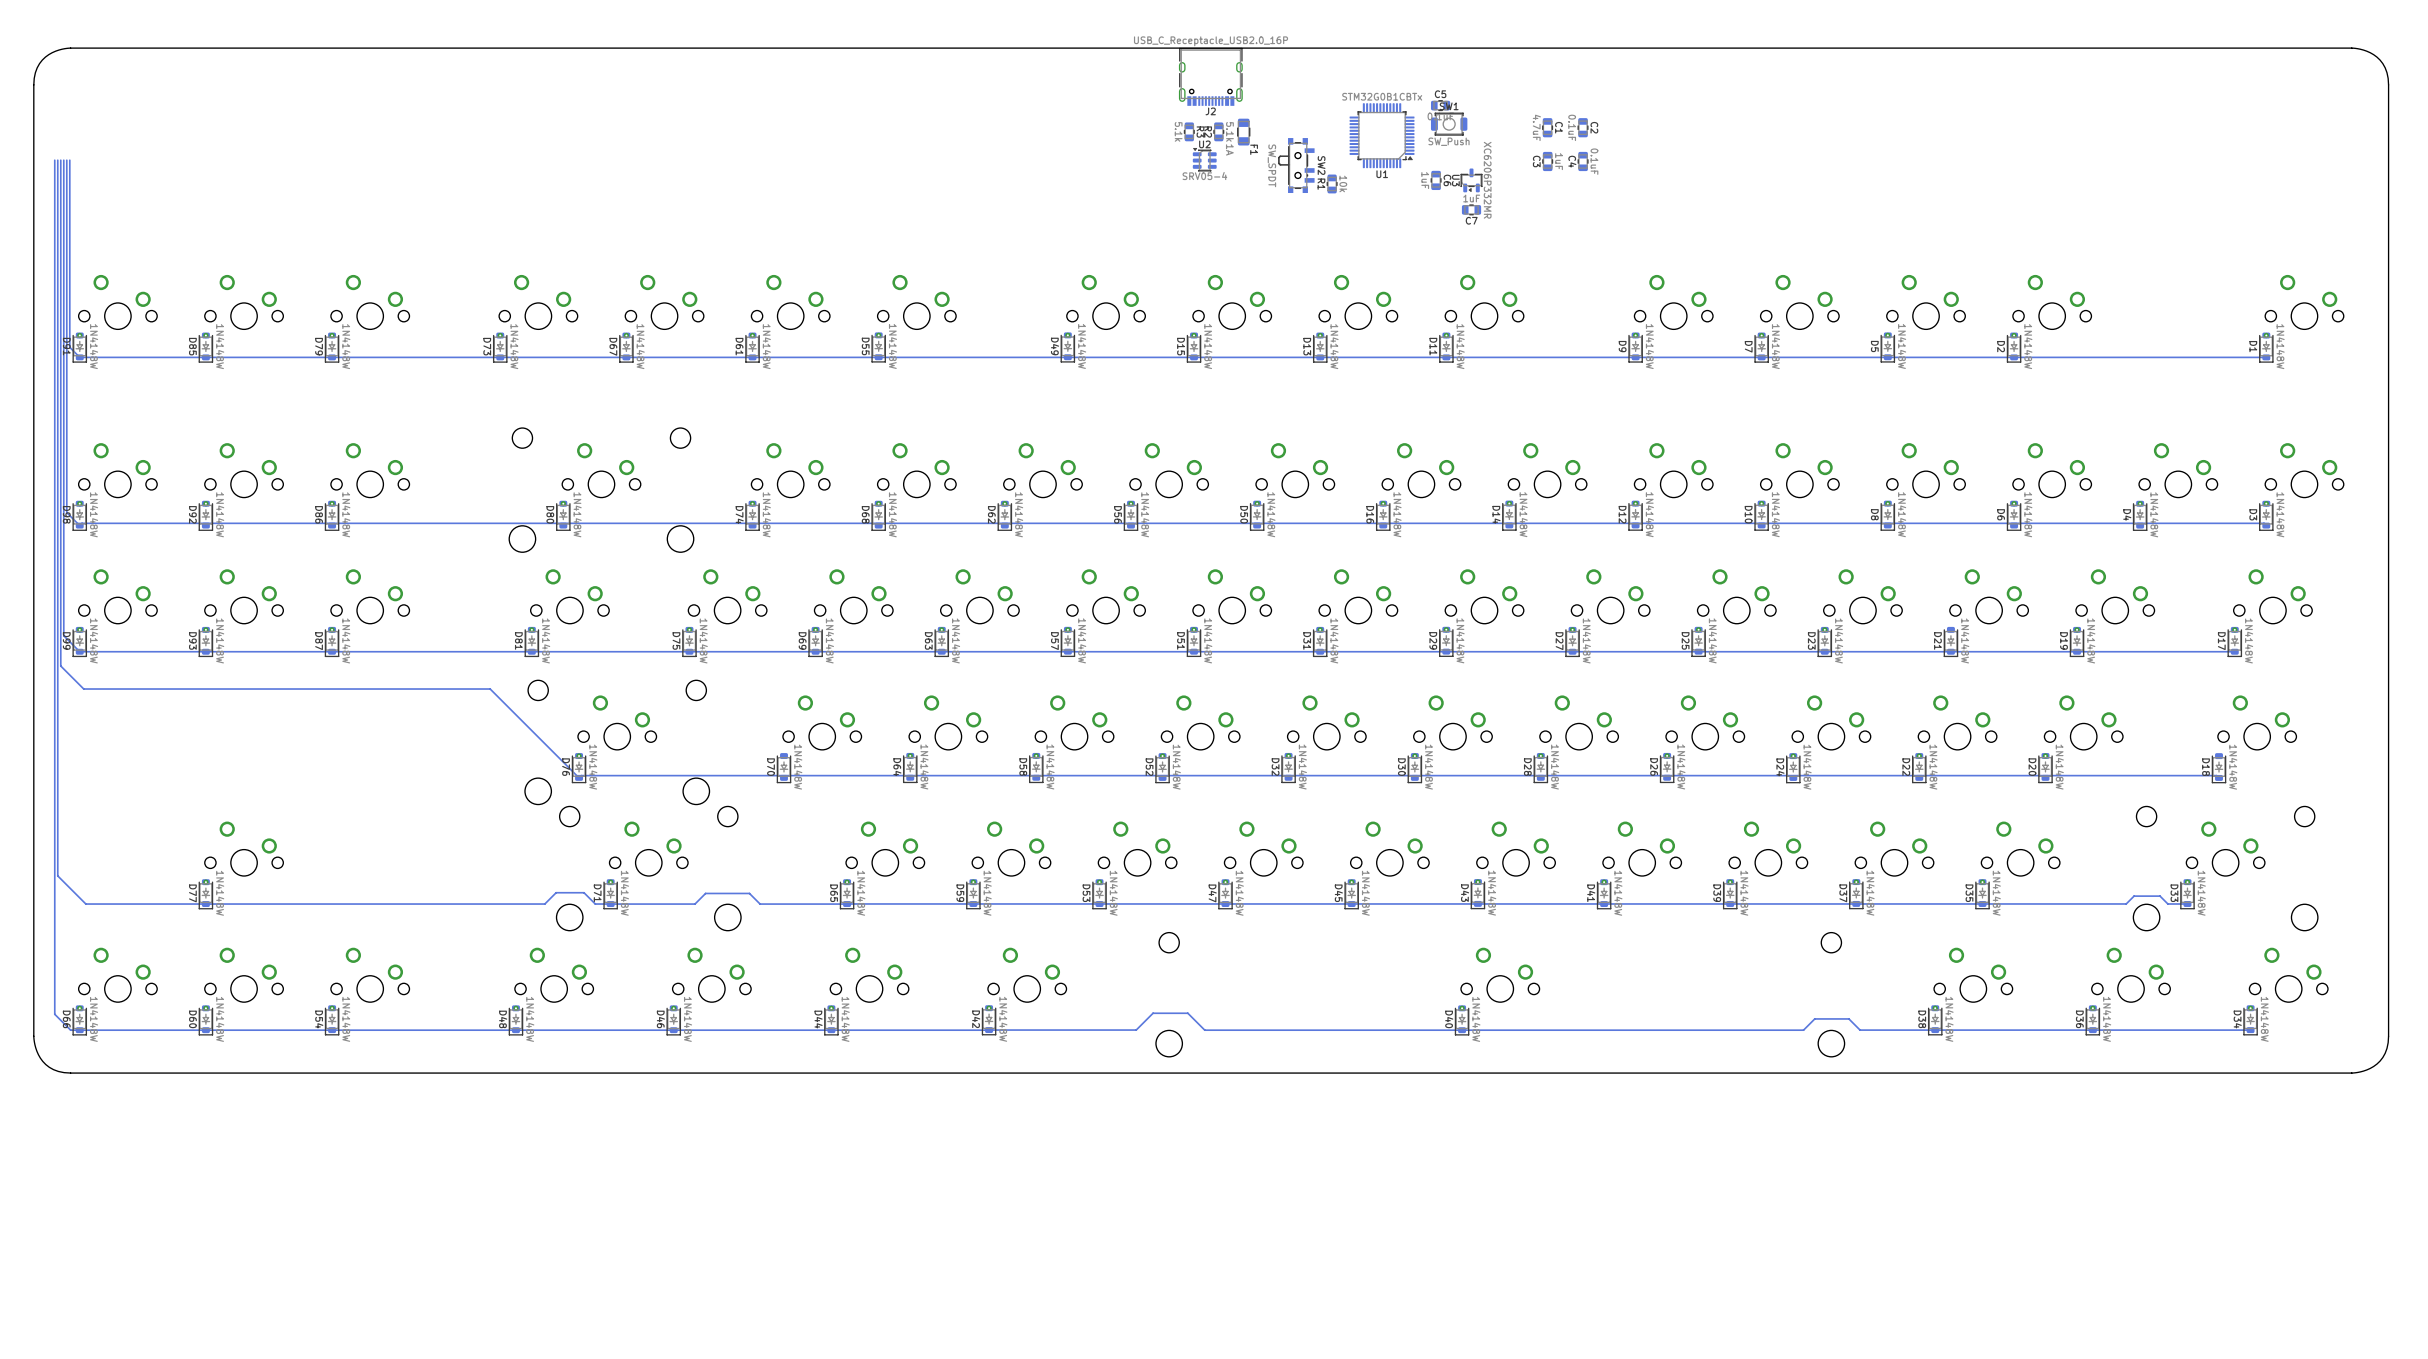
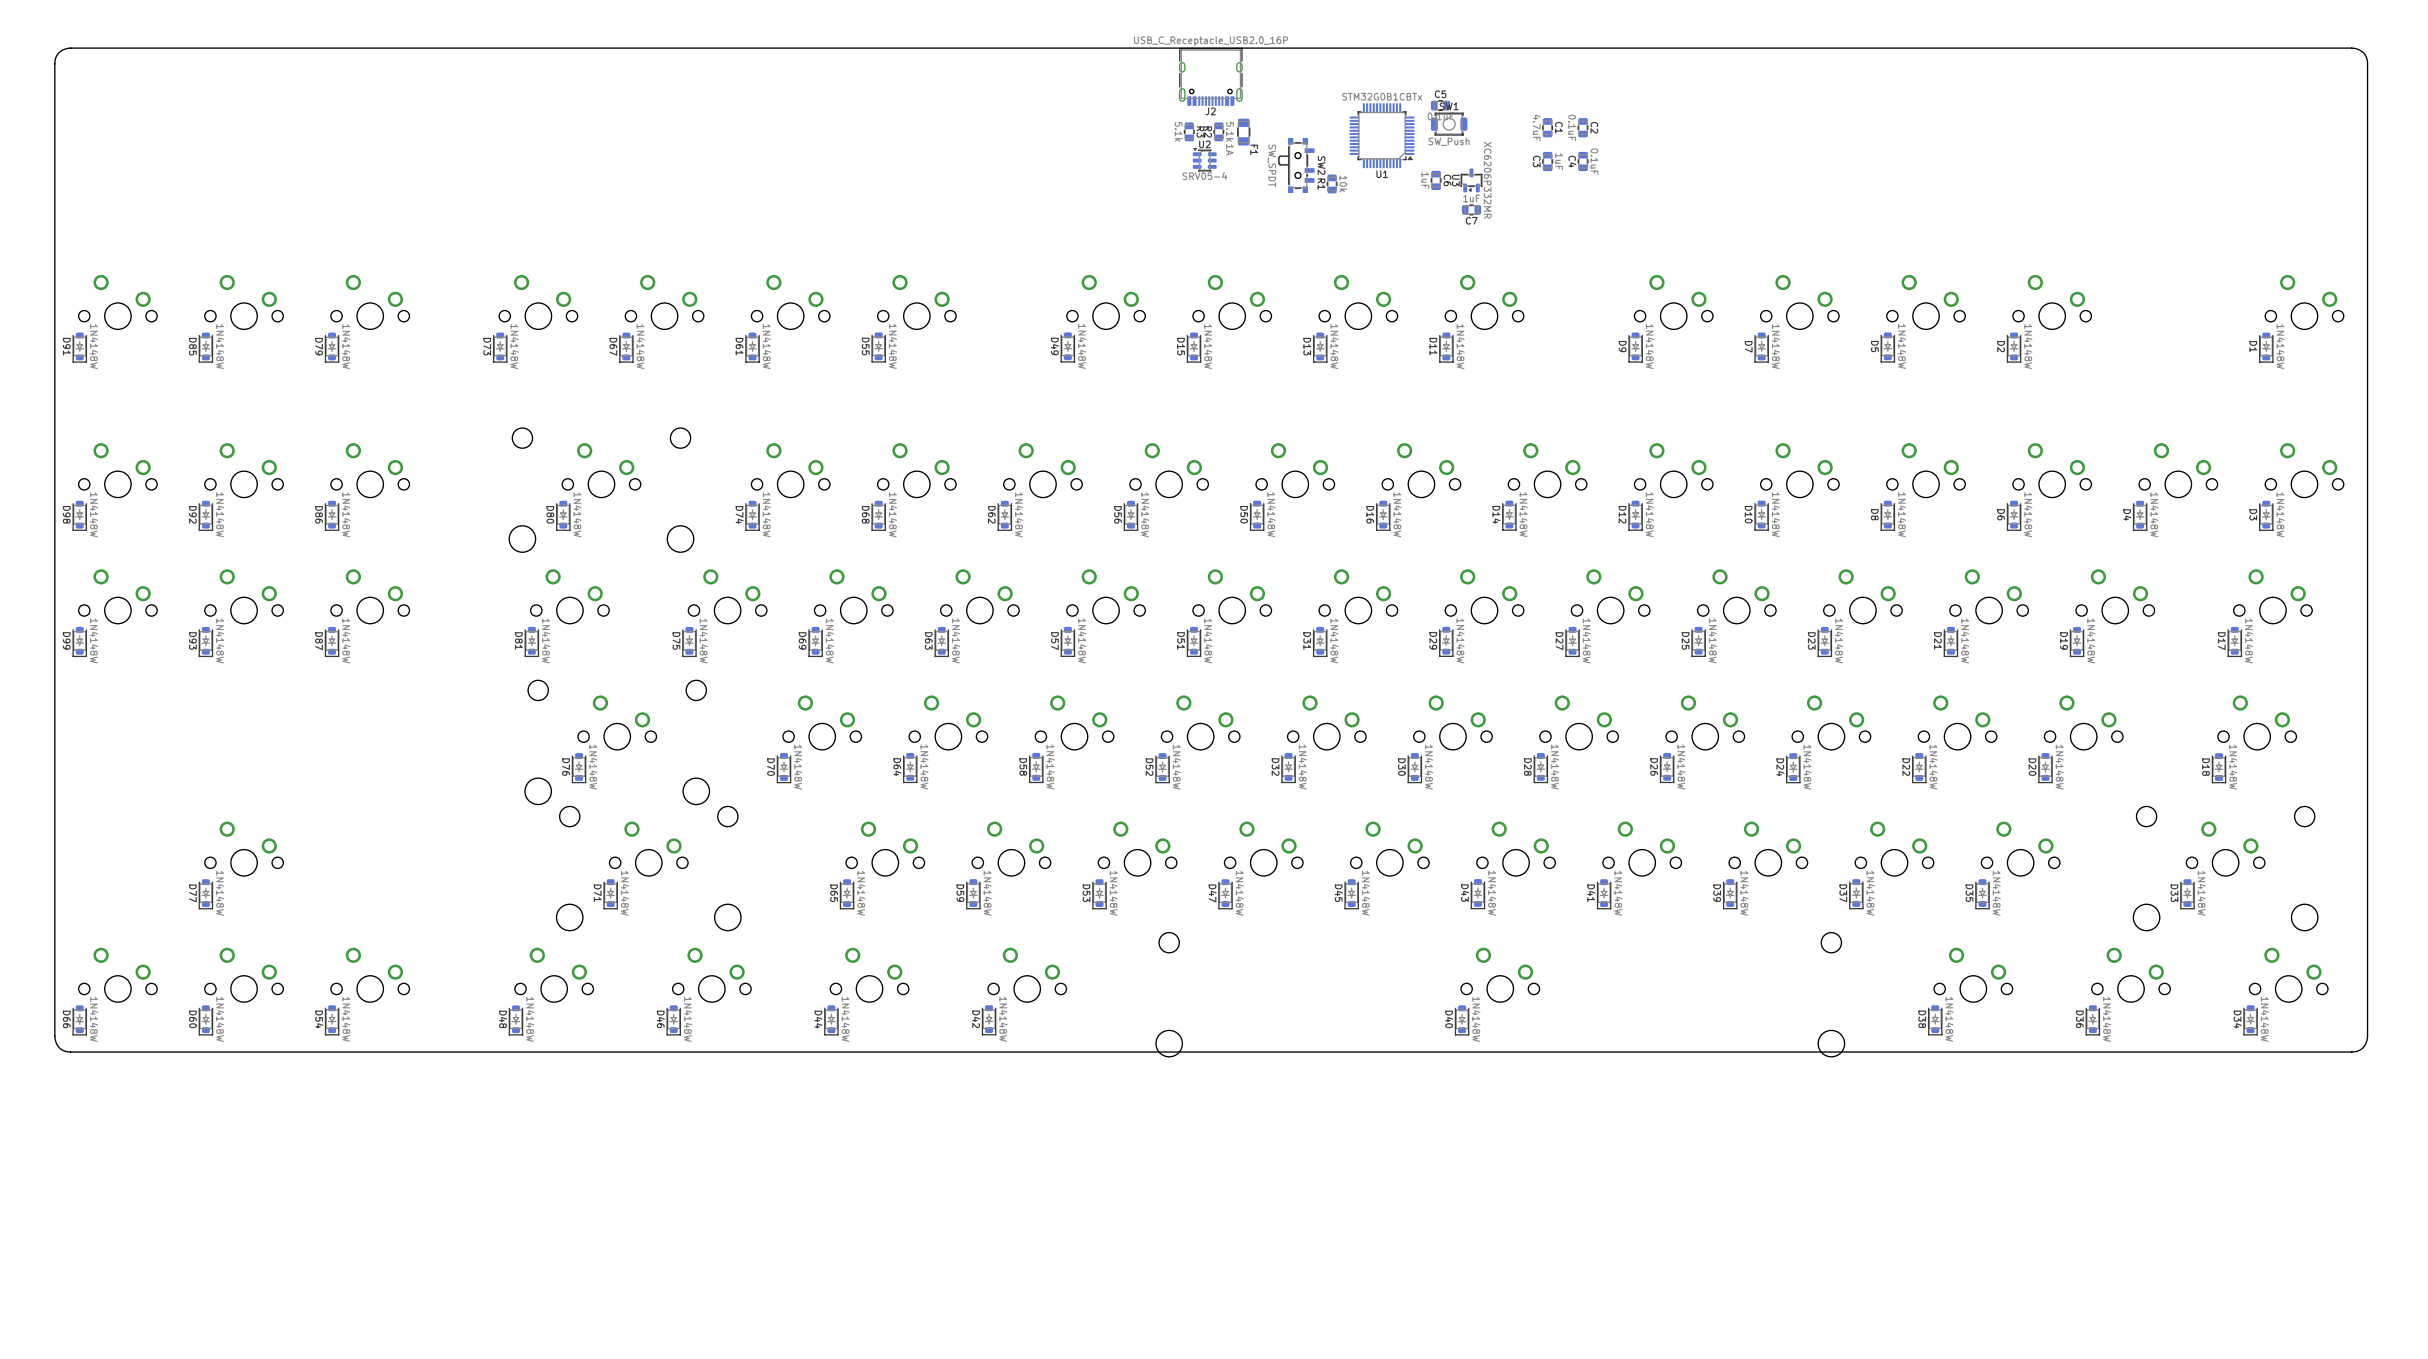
board edge: (2351, 48) (2366, 51) (2380, 60) (2386, 72) (2388, 84) (2388, 1036) (2386, 1048) (2380, 1061) (2366, 1069) (2351, 1073) (70, 1073) (53, 1069) (40, 1058) (33, 1036) (33, 84) (35, 72) (42, 60) (55, 51) (70, 48) -> (2351, 48) (2363, 53) (2367, 63) (2367, 1036) (2362, 1048) (2351, 1052) (63, 1050) (57, 1045) (54, 1036) (54, 63) (58, 53) (70, 48)
track: (54, 160) (54, 1014) (70, 1030) (1136, 1030) (1153, 1013) (1187, 1013) (1204, 1030) (1803, 1030) (1814, 1018) (1848, 1018) (1860, 1030) (2250, 1030) -> none
track: (57, 160) (57, 875) (85, 904) (544, 904) (556, 892) (584, 892) (595, 904) (694, 904) (705, 893) (749, 893) (760, 904) (847, 904) -> none
track: (60, 160) (60, 666) (83, 689) (490, 689) (579, 777) (581, 775) (2216, 775) (2219, 777) -> none
track: (63, 160) (63, 635) (79, 651) (2234, 651) -> none
track: (66, 160) (66, 512) (79, 525) (82, 523) (2264, 523) (2266, 525) -> none
track: (69, 160) (69, 347) (79, 357) (2266, 357) -> none
via: (79, 335) -> none
via: (205, 335) -> none
via: (332, 335) -> none
via: (500, 335) -> none
via: (626, 335) -> none
via: (752, 335) -> none
via: (878, 335) -> none
via: (1067, 335) -> none
via: (1194, 335) -> none
via: (1320, 335) -> none
via: (1446, 335) -> none
via: (1635, 335) -> none
via: (1761, 335) -> none
via: (1887, 335) -> none
via: (2014, 335) -> none
via: (2266, 335) -> none
via: (79, 503) -> none
via: (205, 503) -> none
via: (332, 503) -> none
via: (563, 503) -> none
via: (752, 503) -> none
via: (878, 503) -> none
via: (1004, 503) -> none
via: (1130, 503) -> none
via: (1257, 503) -> none
via: (1383, 503) -> none
via: (1509, 503) -> none
via: (1635, 503) -> none
via: (1761, 503) -> none
via: (1887, 503) -> none
via: (2014, 503) -> none
via: (2140, 503) -> none
via: (2266, 503) -> none
via: (79, 629) -> none
via: (205, 629) -> none
via: (332, 629) -> none
via: (531, 629) -> none
via: (689, 629) -> none
via: (815, 629) -> none
via: (941, 629) -> none
via: (1067, 629) -> none
via: (1194, 629) -> none
via: (1320, 629) -> none
via: (1446, 629) -> none
via: (1572, 629) -> none
via: (1698, 629) -> none
via: (1824, 629) -> none
via: (2077, 629) -> none
via: (2234, 629) -> none
via: (910, 755) -> none
via: (1036, 755) -> none
via: (1288, 755) -> none
via: (1540, 755) -> none
via: (1667, 755) -> none
via: (579, 756) -> none
via: (1162, 756) -> none
via: (1414, 756) -> none
via: (1793, 756) -> none
via: (1919, 756) -> none
via: (2045, 756) -> none
via: (205, 882) -> none
via: (610, 882) -> none
via: (847, 882) -> none
via: (973, 882) -> none
via: (1099, 882) -> none
via: (1225, 882) -> none
via: (1351, 882) -> none
via: (1477, 882) -> none
via: (1604, 882) -> none
via: (1730, 882) -> none
via: (1856, 882) -> none
via: (1982, 882) -> none
via: (2187, 882) -> none
track: (2187, 904) (2167, 904) (2160, 896) (2134, 896) (2126, 903) (847, 903) -> none
via: (79, 1008) -> none
via: (205, 1008) -> none
via: (332, 1008) -> none
via: (515, 1008) -> none
via: (673, 1008) -> none
via: (831, 1008) -> none
via: (989, 1008) -> none
via: (1462, 1008) -> none
via: (1935, 1008) -> none
via: (2092, 1008) -> none
via: (2250, 1008) -> none

